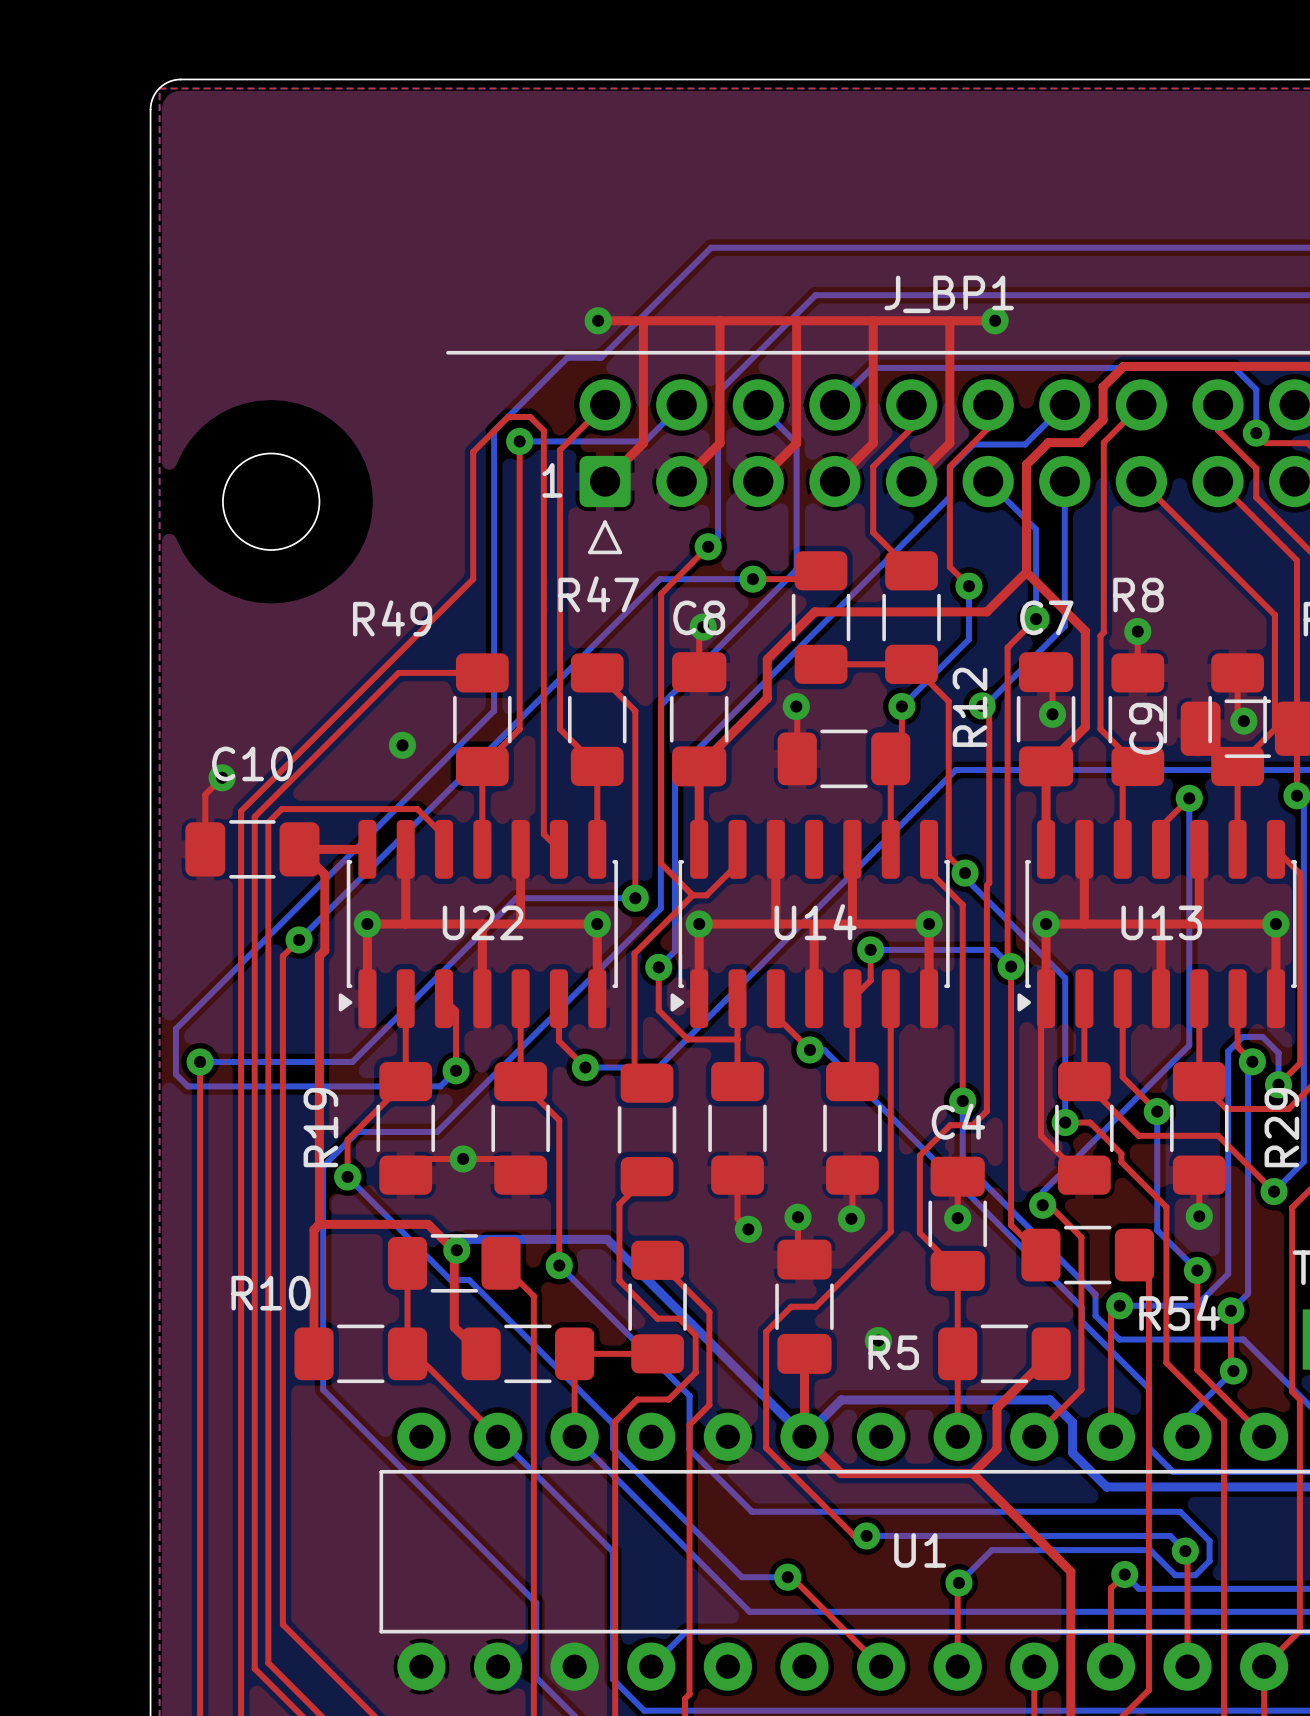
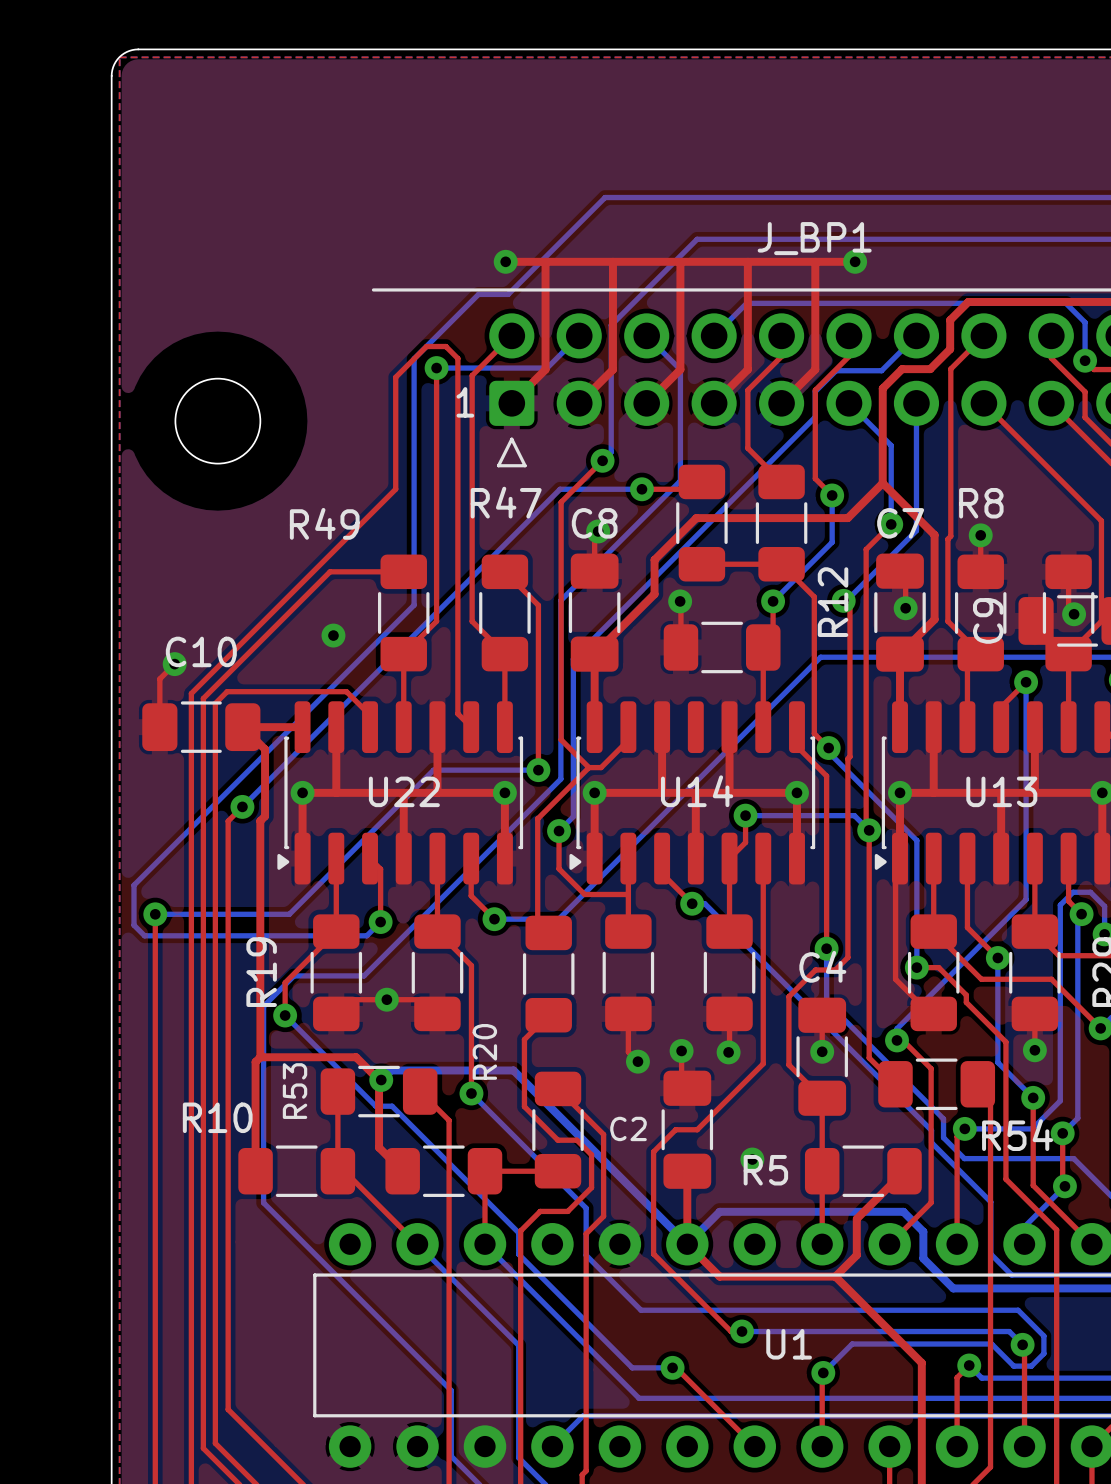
R20 name: none -> R20 (484, 1051)
R53 name: none -> R53 (295, 1091)
C2 name: none -> C2 (628, 1128)

